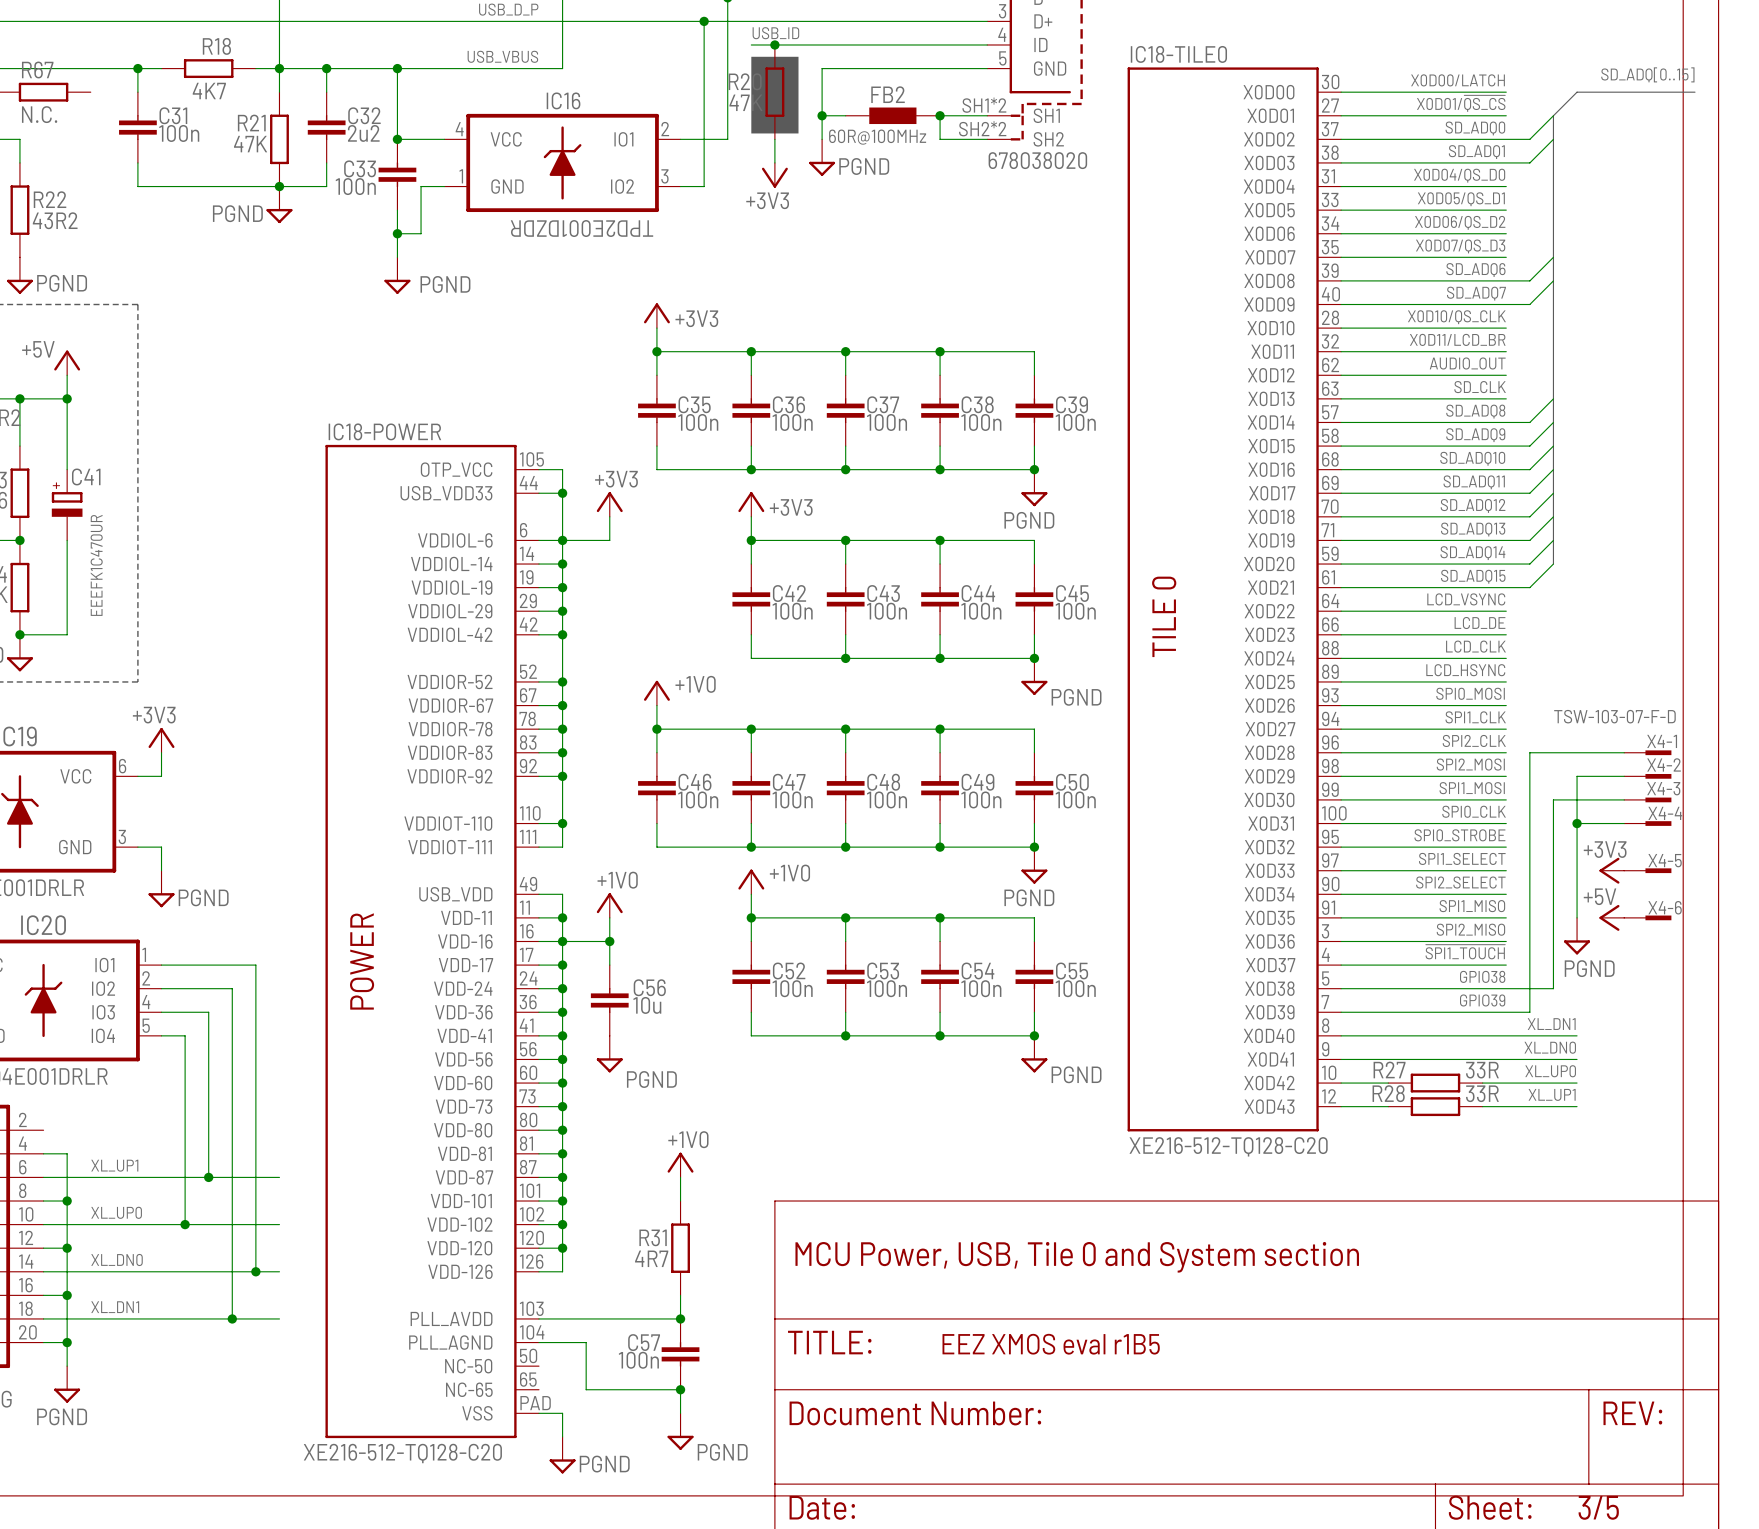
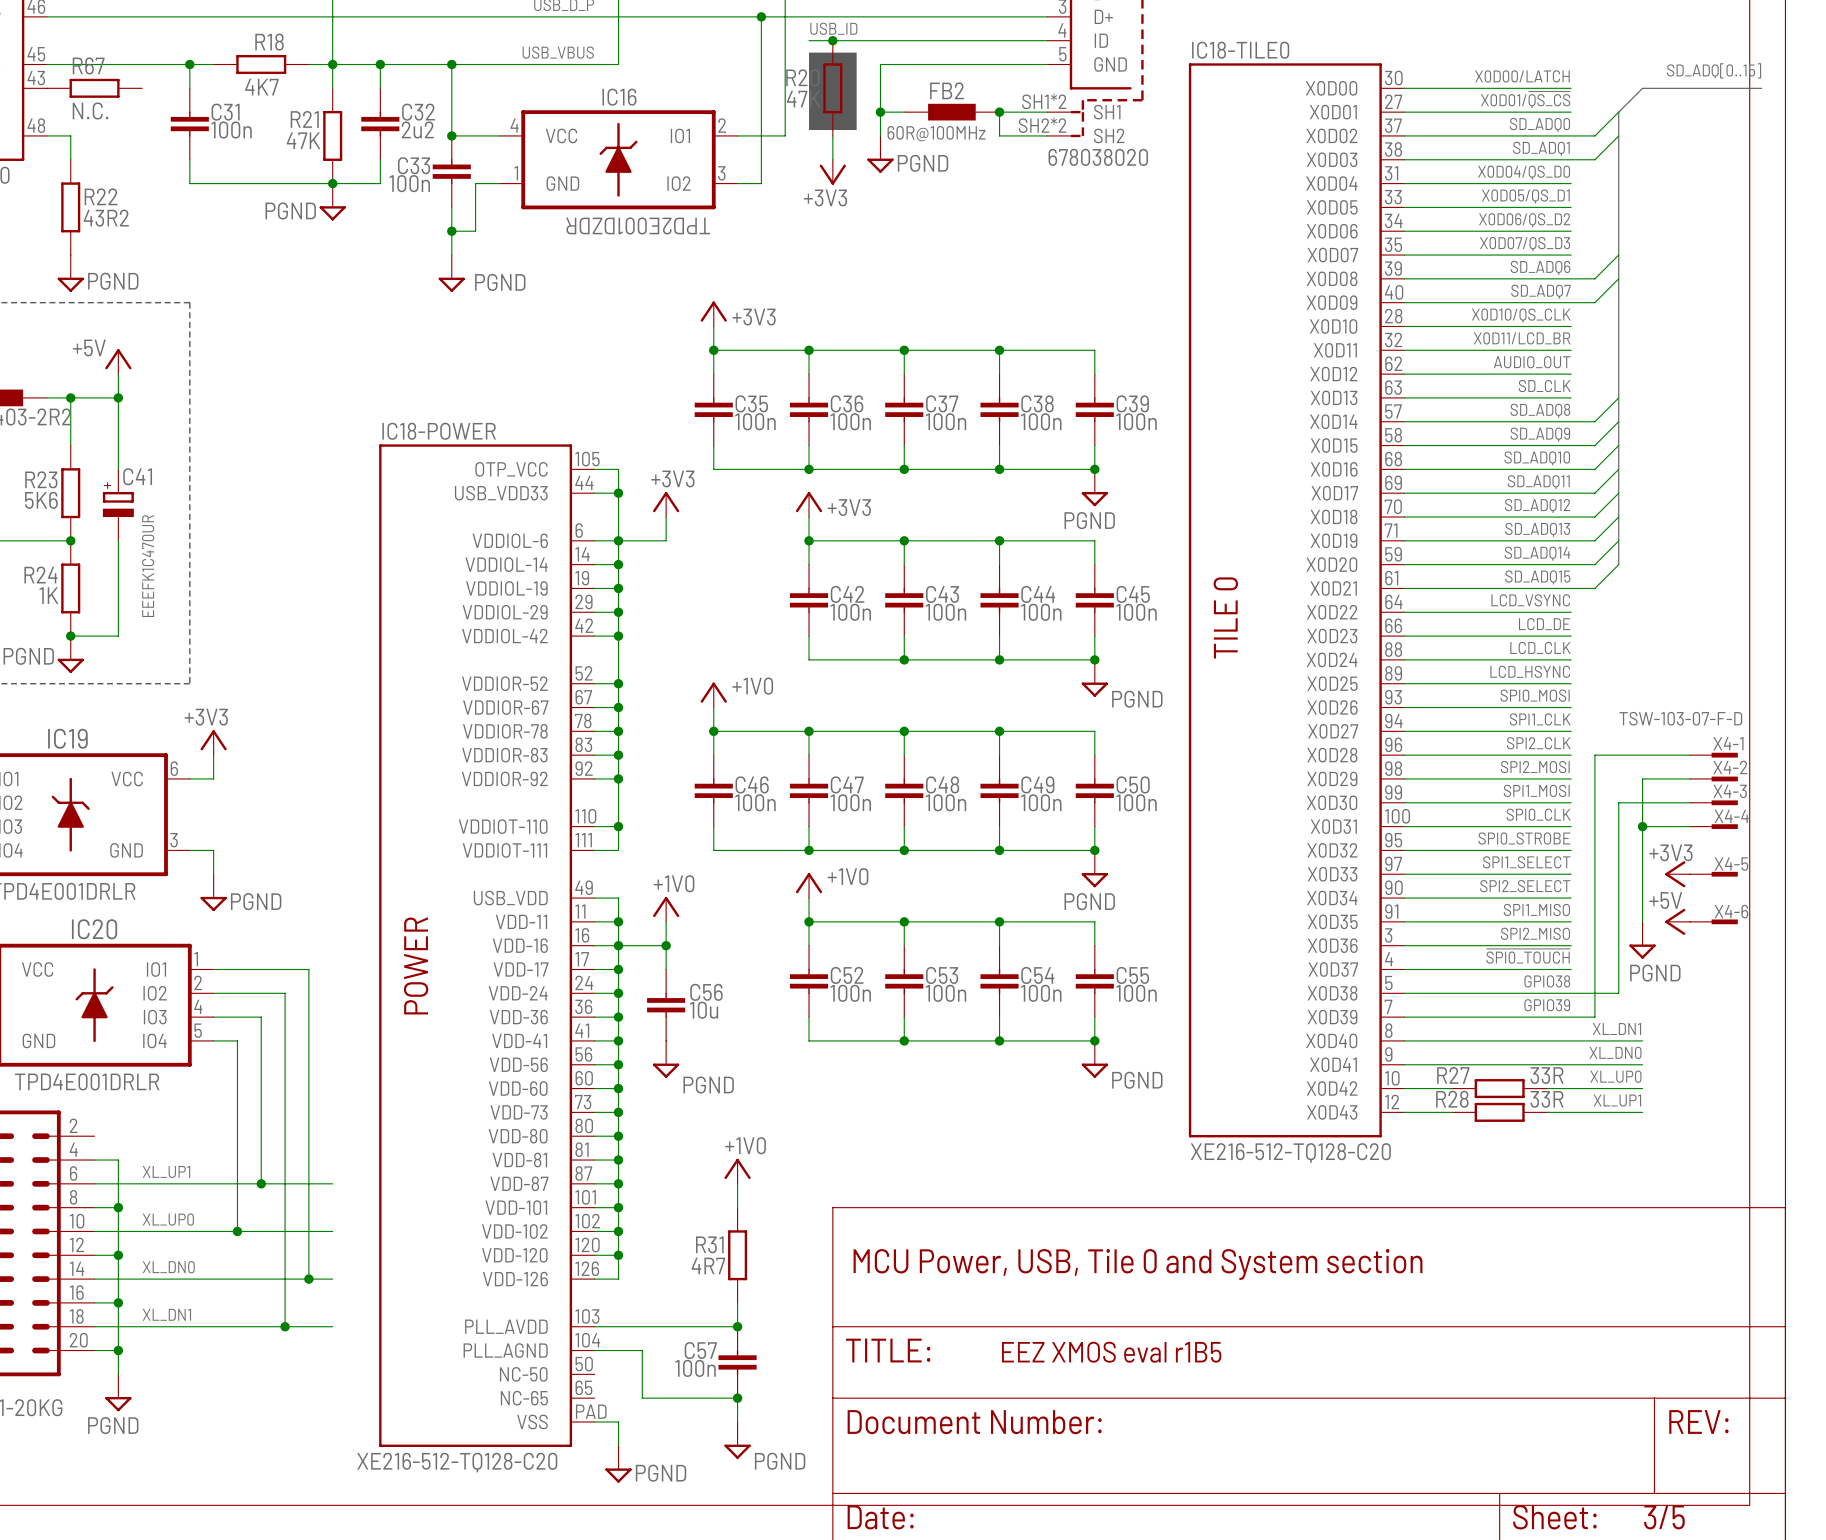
label: ~{SPI1_TOUCH} (1465, 952) -> ~{SPI0_TOUCH} (1528, 956)

